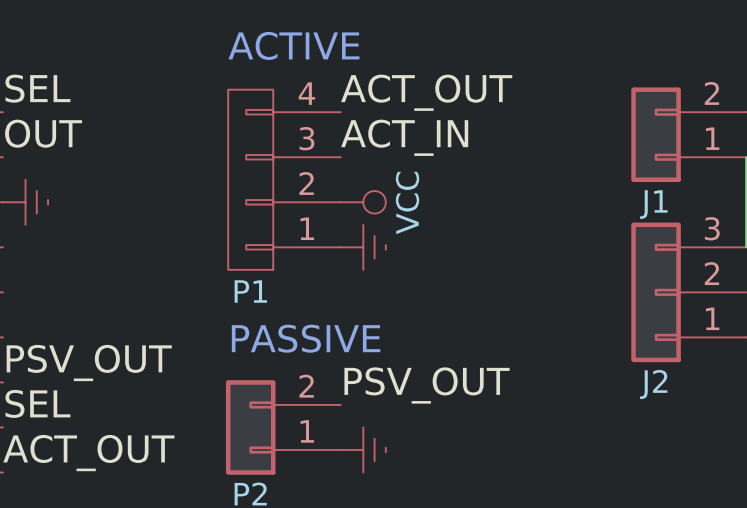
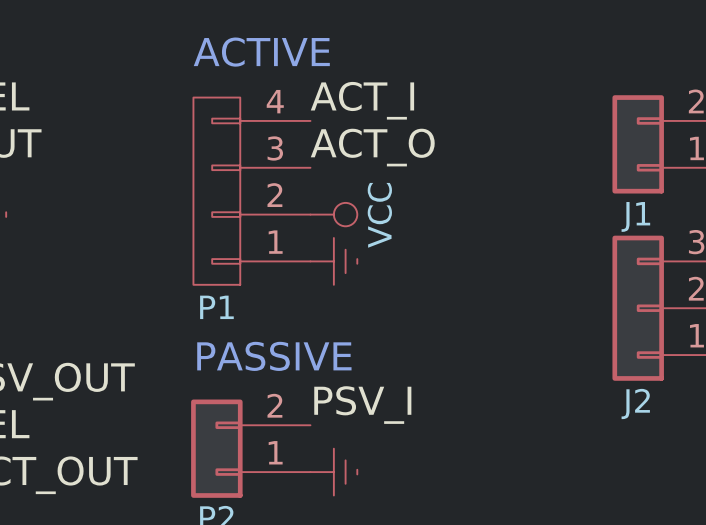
label: ACT_OUT (426, 92) -> ACT_I (362, 100)
label: ACT_IN (404, 137) -> ACT_O (372, 147)
label: PSV_OUT (427, 385) -> PSV_I (362, 405)

